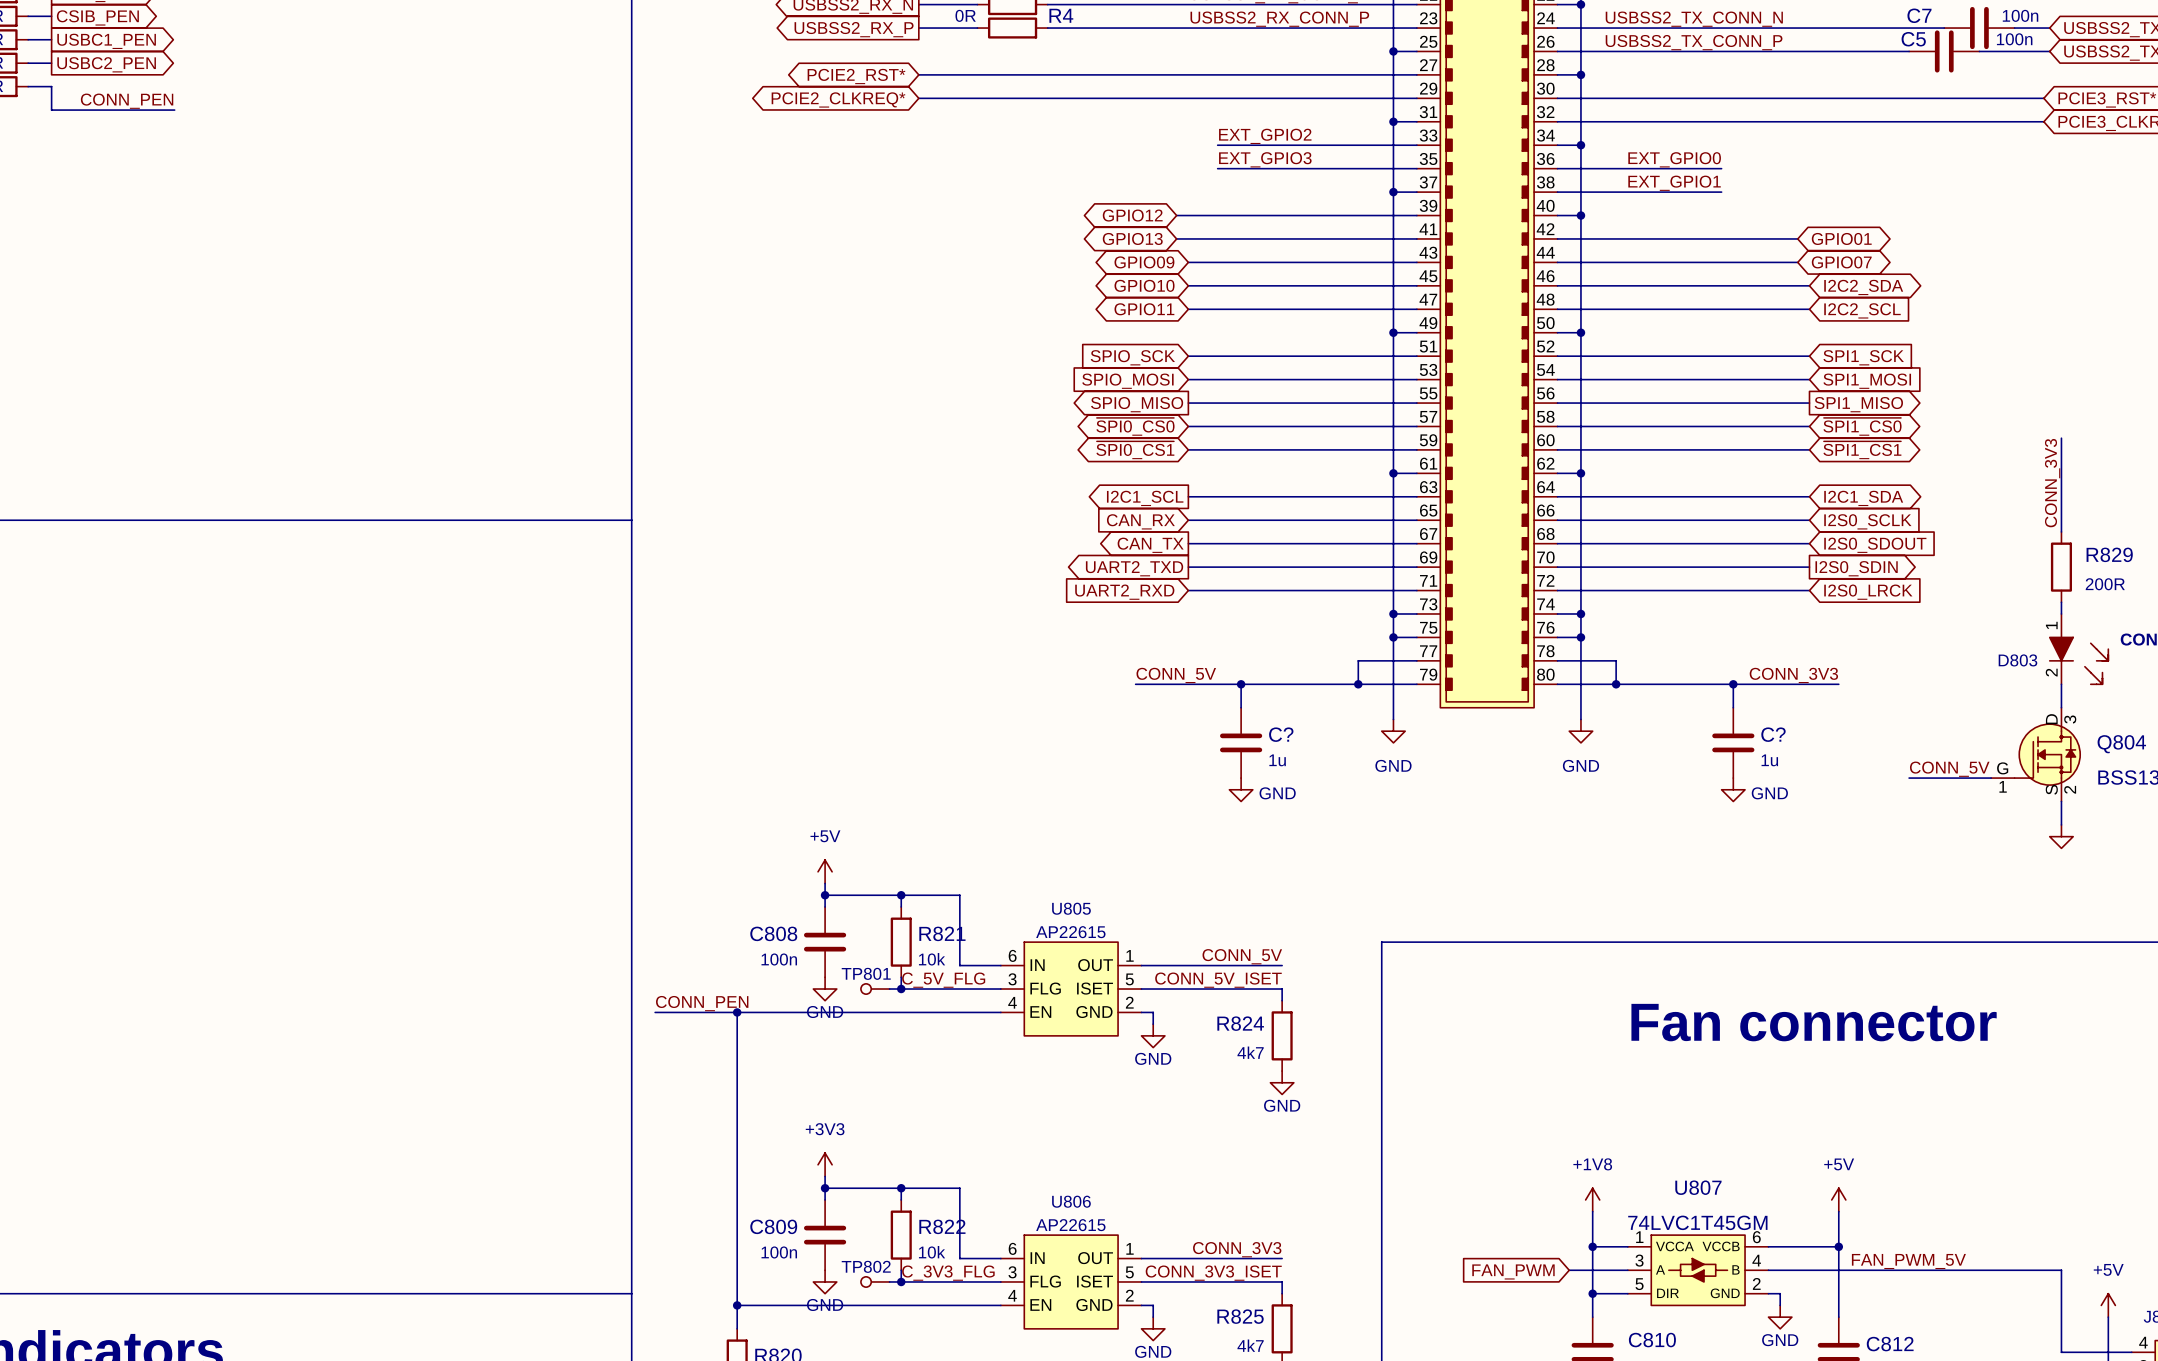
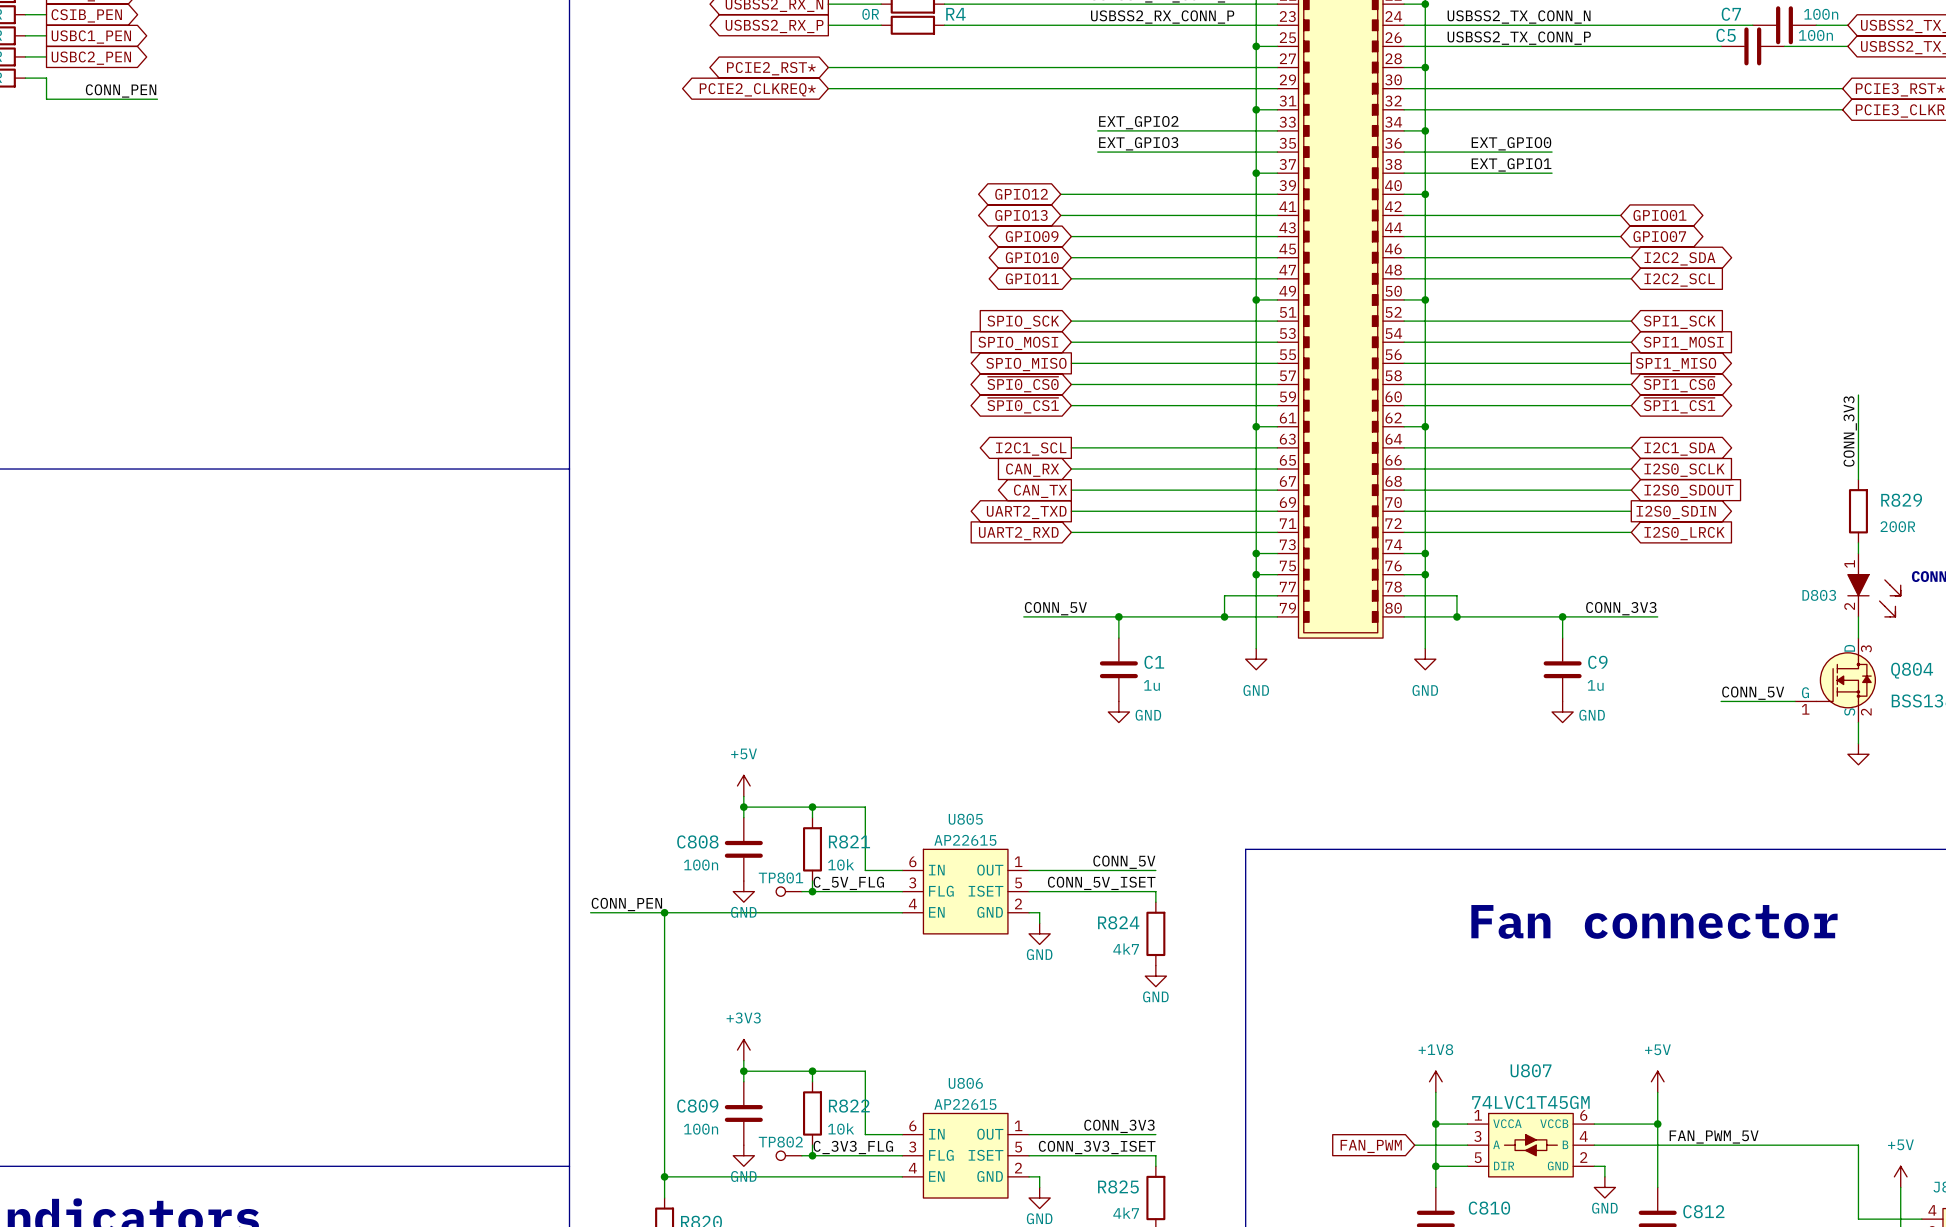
C? name: C? (1281, 734) -> C1 (1154, 662)
C? name: C? (1773, 734) -> C9 (1597, 662)

